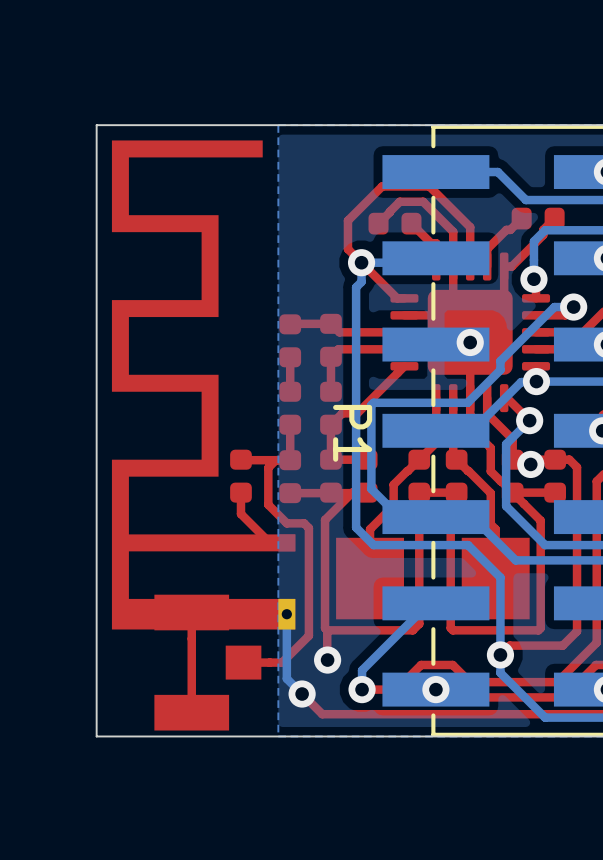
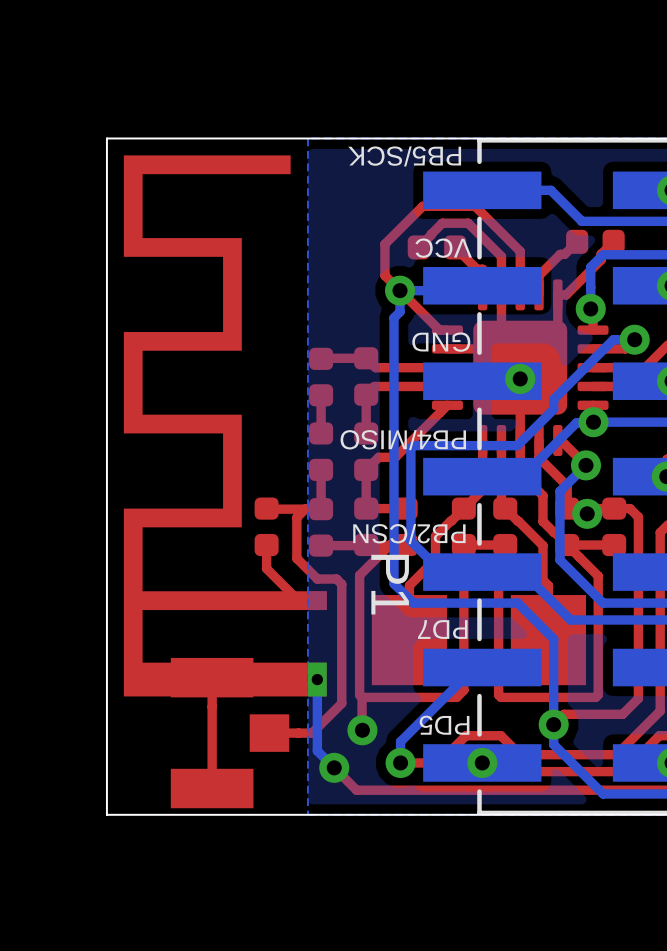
text: none -> PB5/SCK (404, 156)
text: none -> VCC (443, 248)
text: none -> GND (441, 342)
text: none -> PB4/MISO (403, 440)
P1 name position: P1 (352, 433) -> P1 (390, 584)
text: none -> PB2/CSN (409, 534)
text: none -> PD7 (442, 629)
text: none -> PD5 (444, 725)

